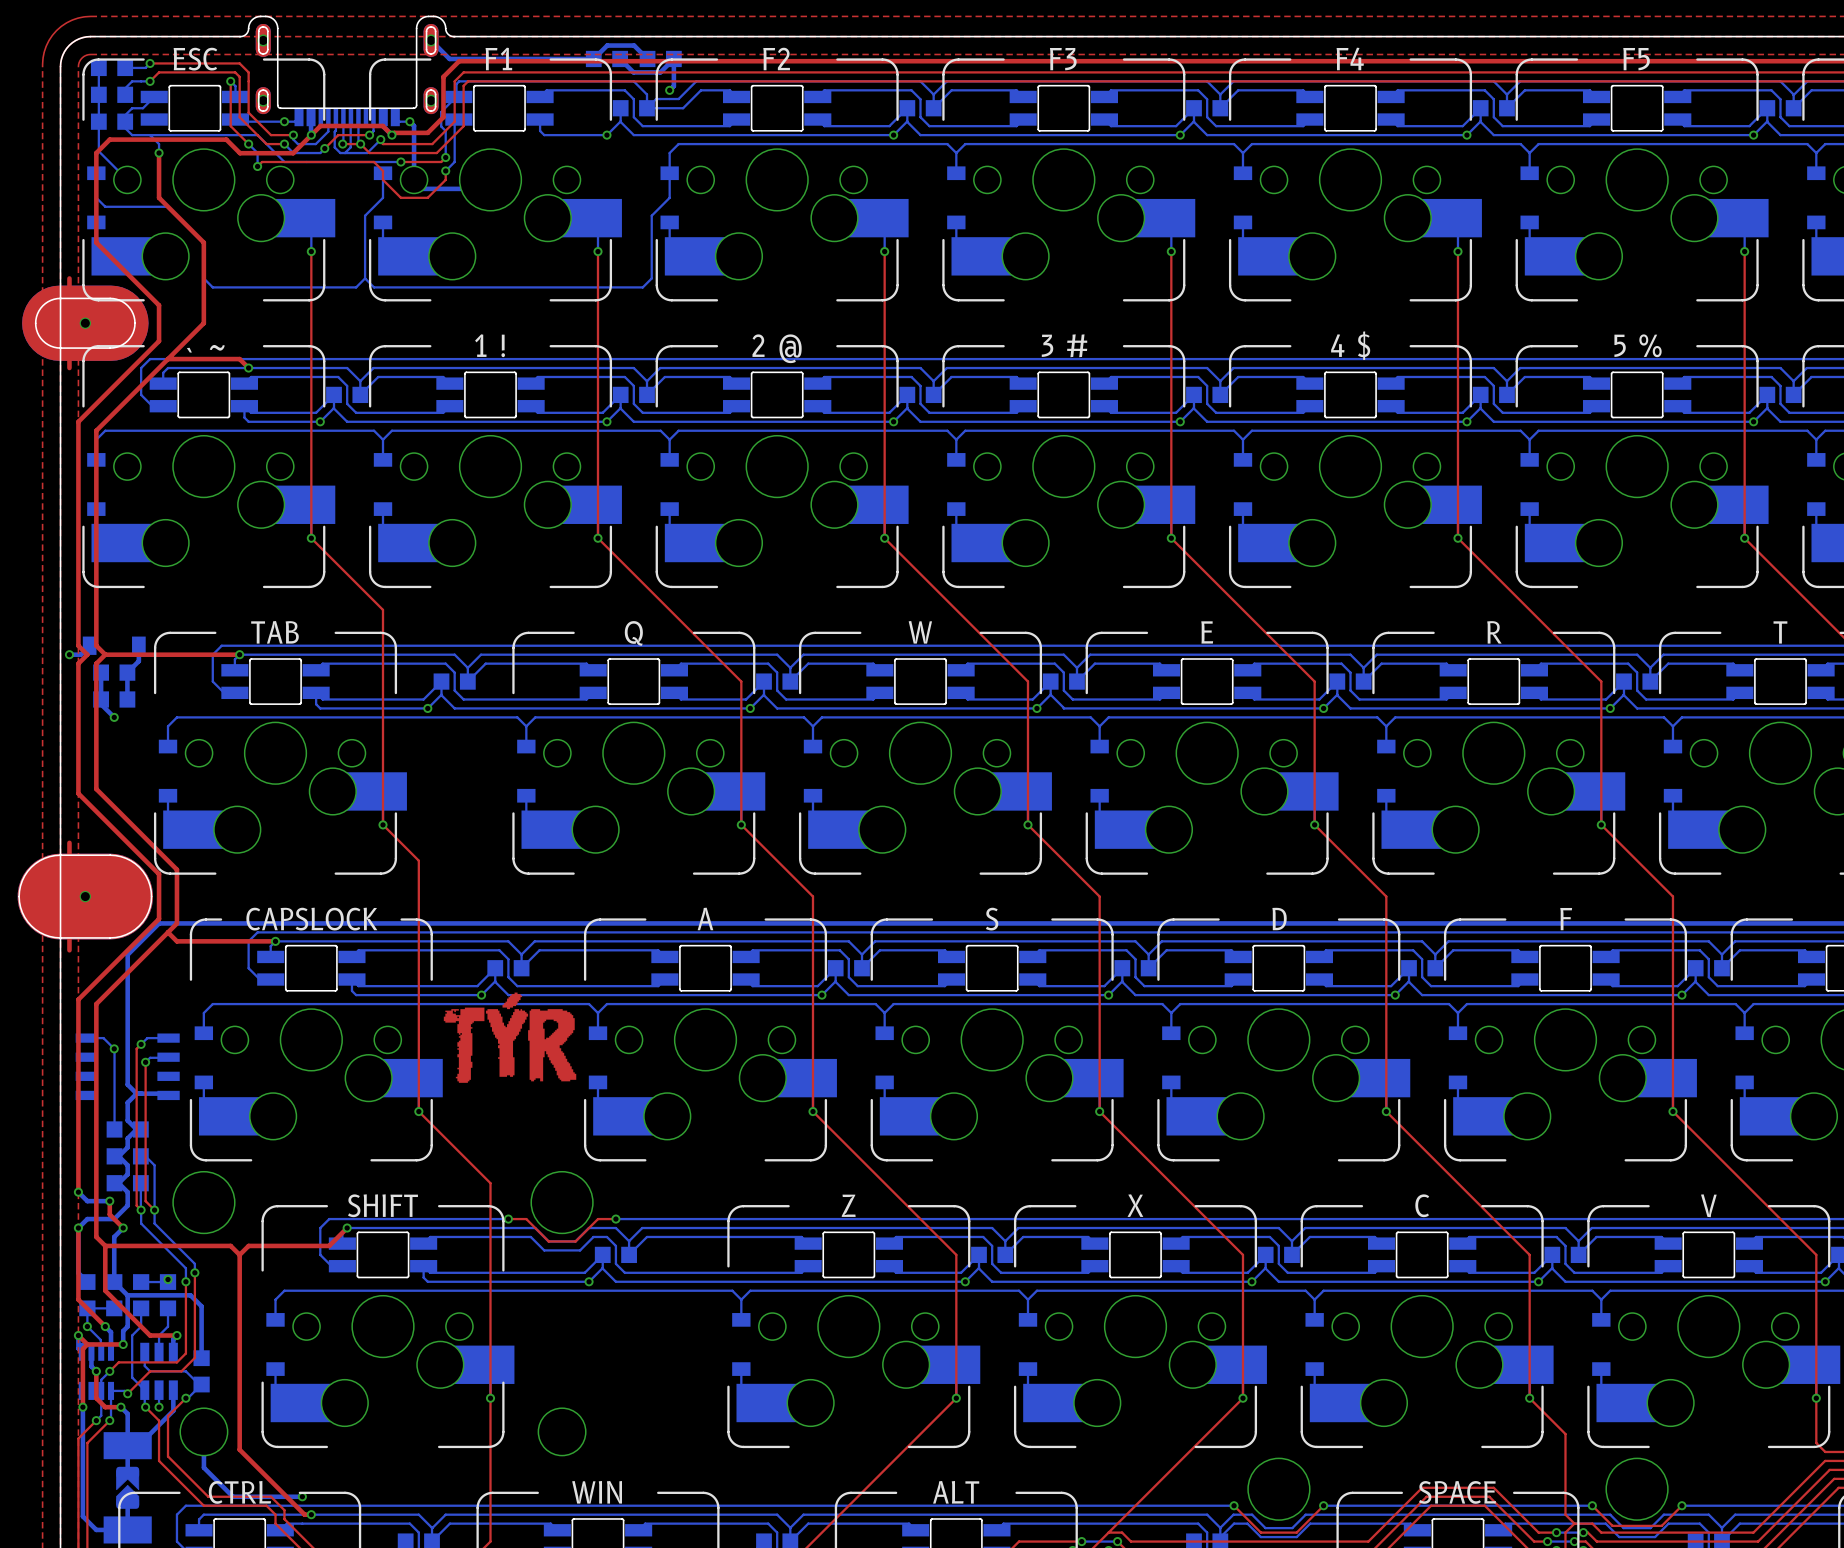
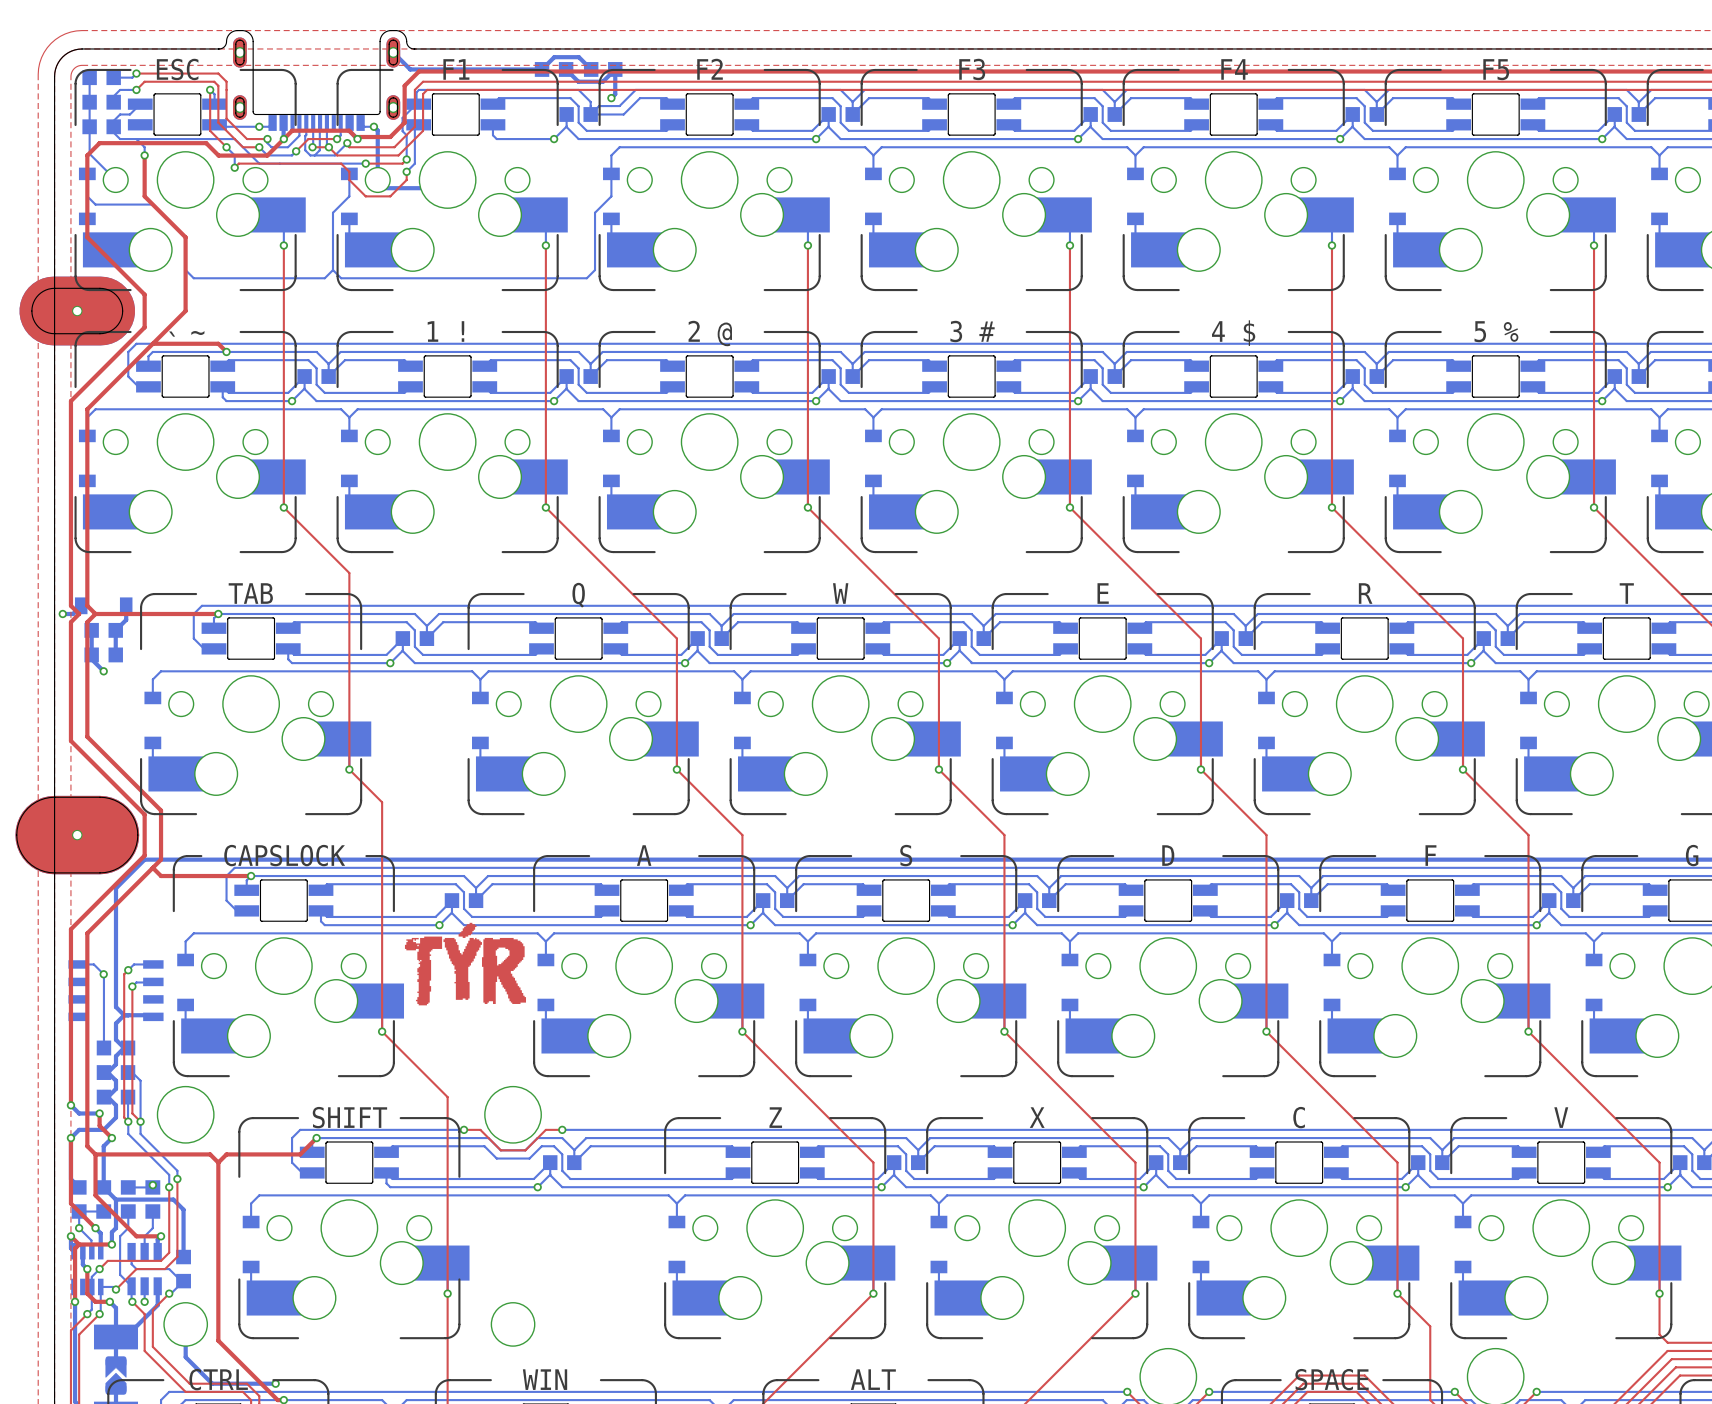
top track: (69, 278) (69, 307) -> none
top track: (69, 339) (69, 368) -> none
top track: (69, 842) (69, 880) -> none
top track: (69, 912) (69, 950) -> none

